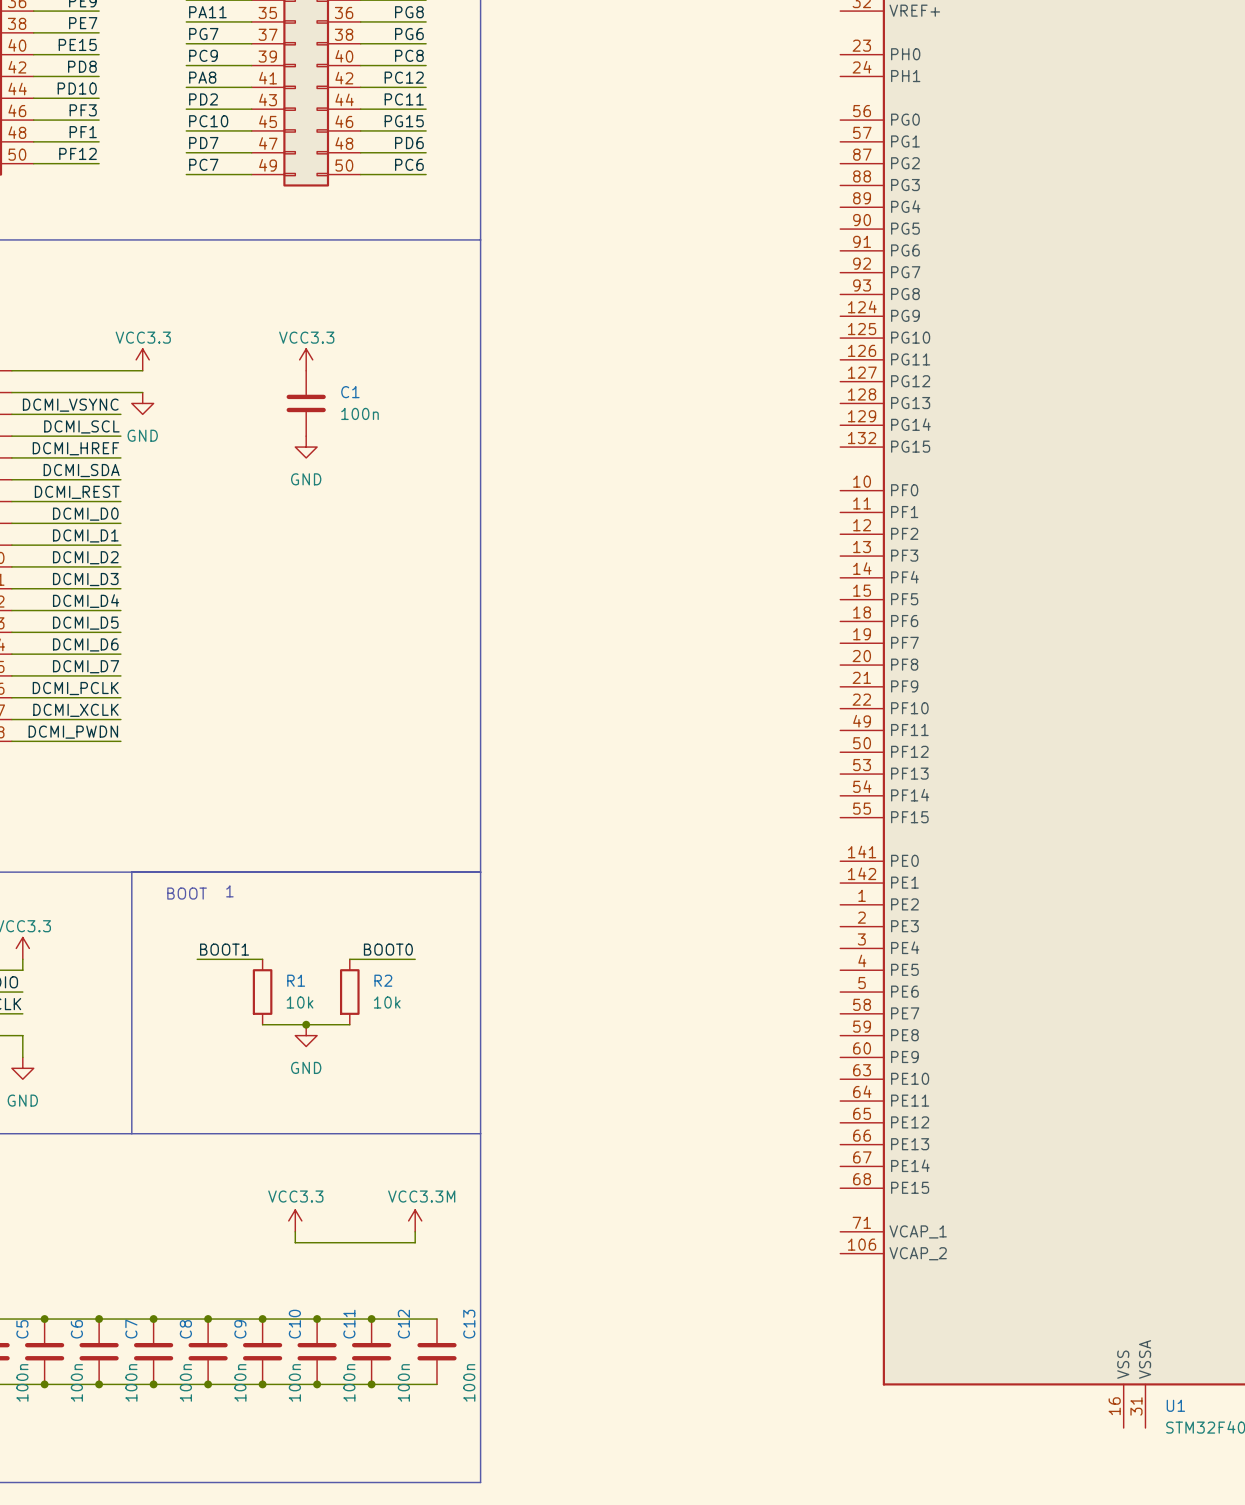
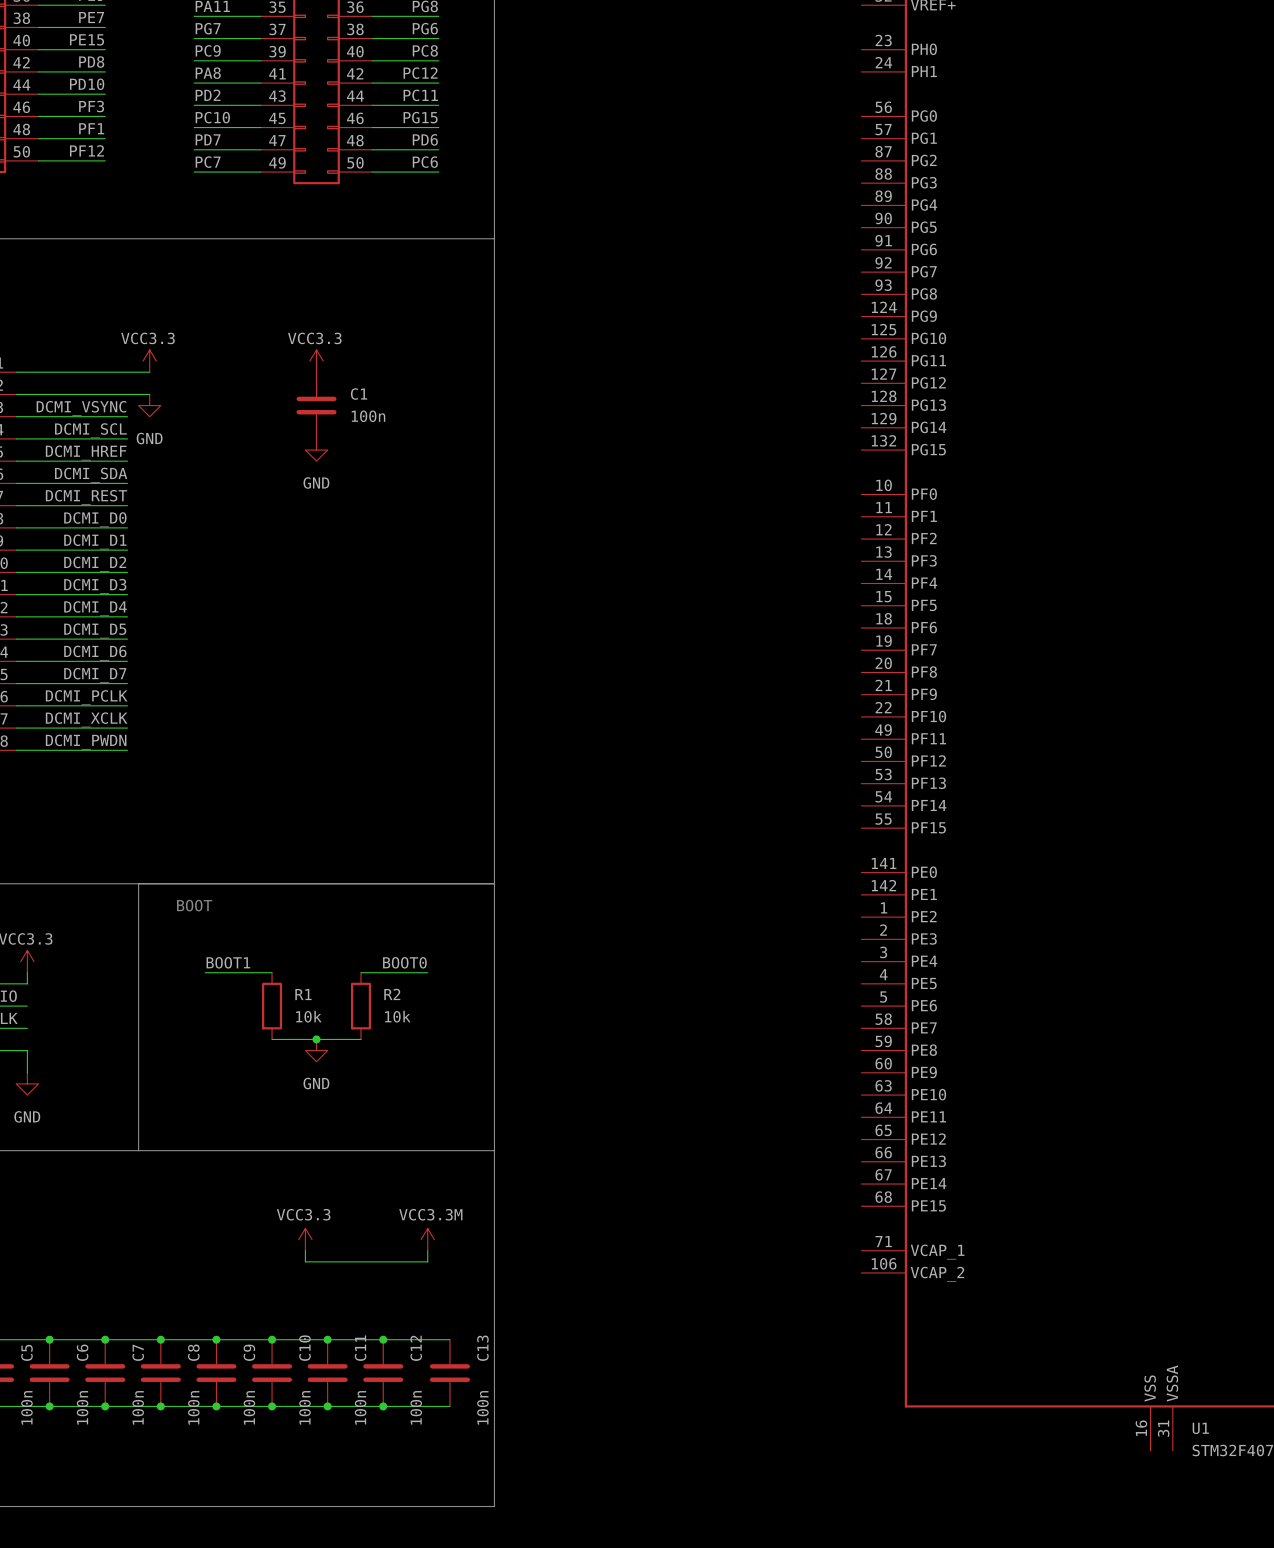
text: 1 (229, 891) -> none

